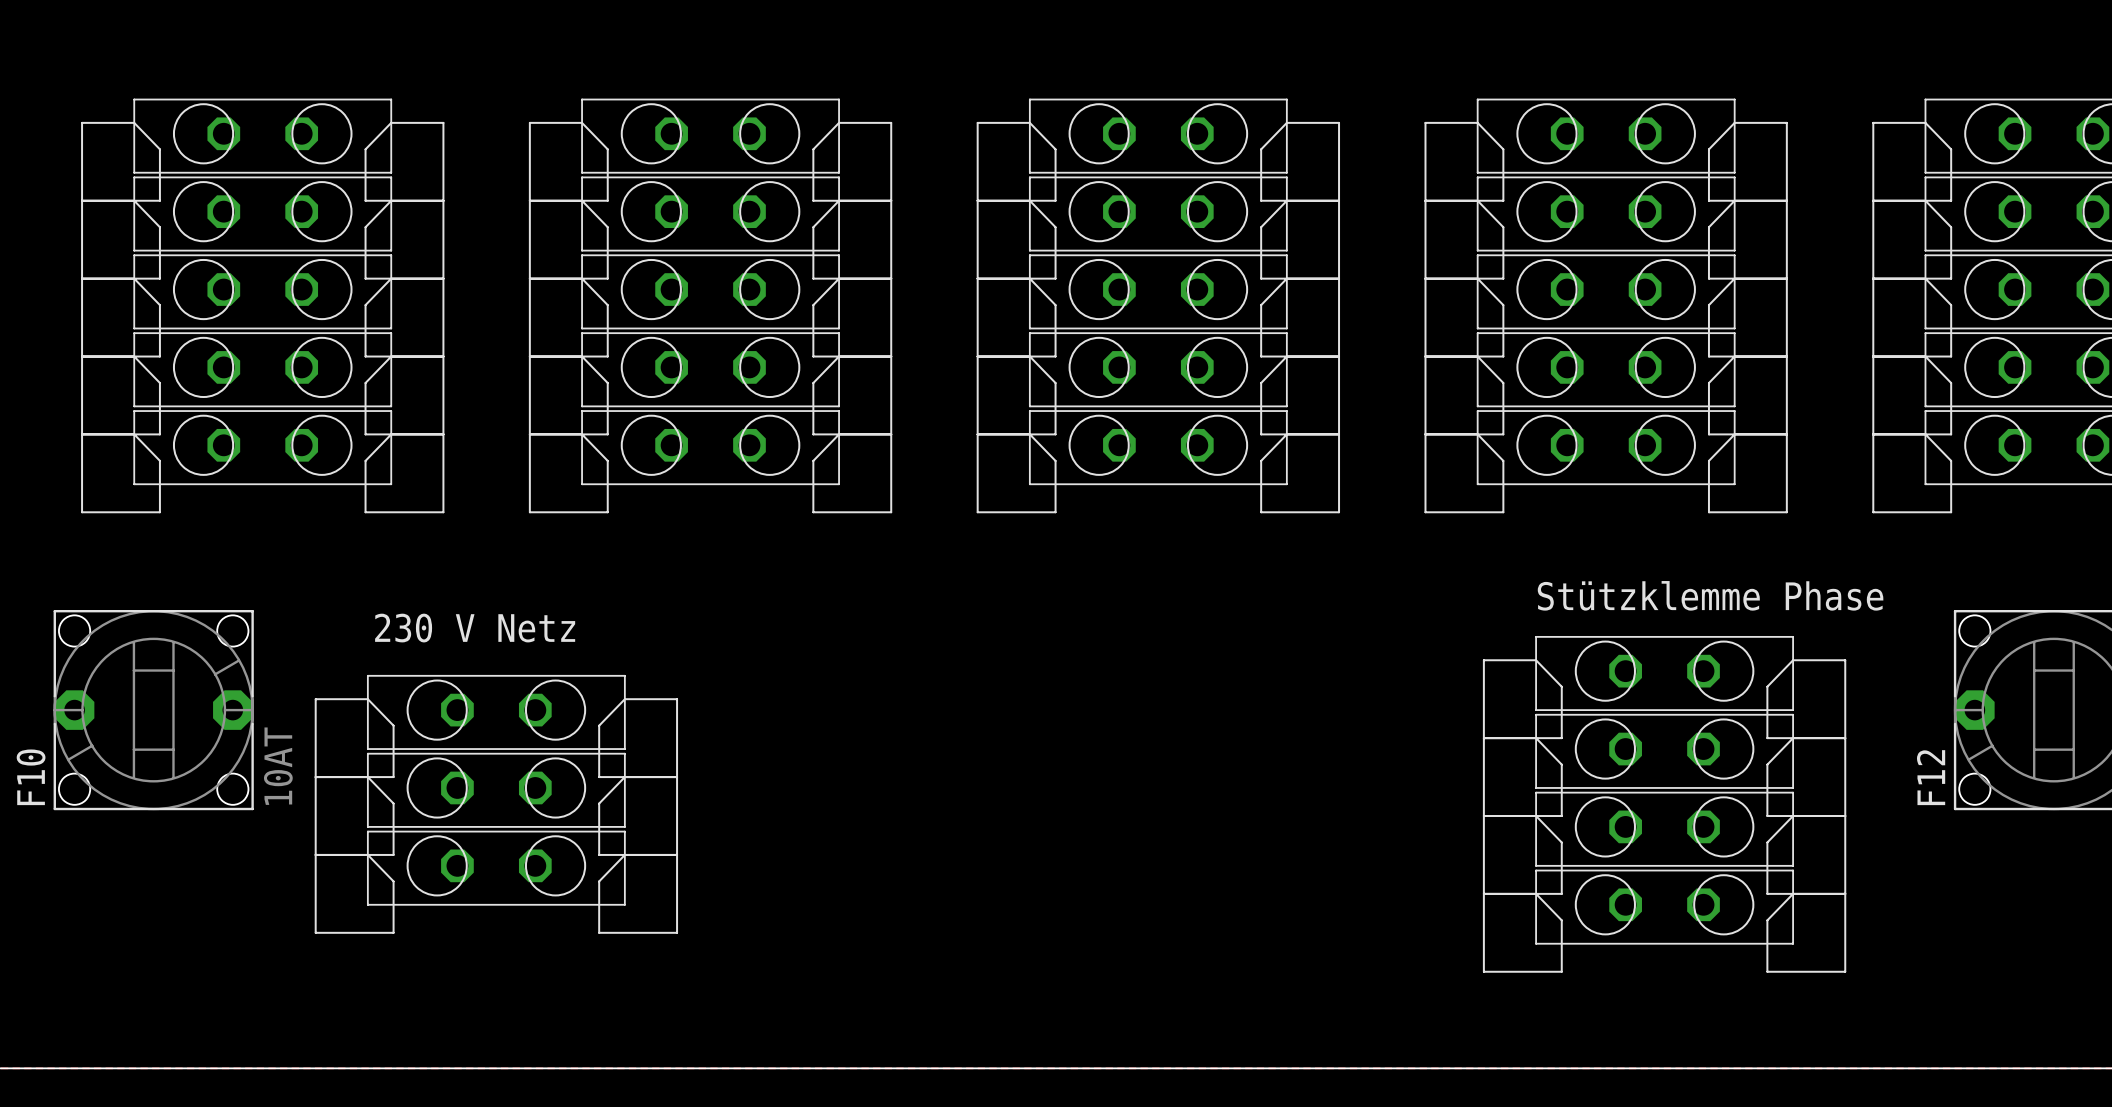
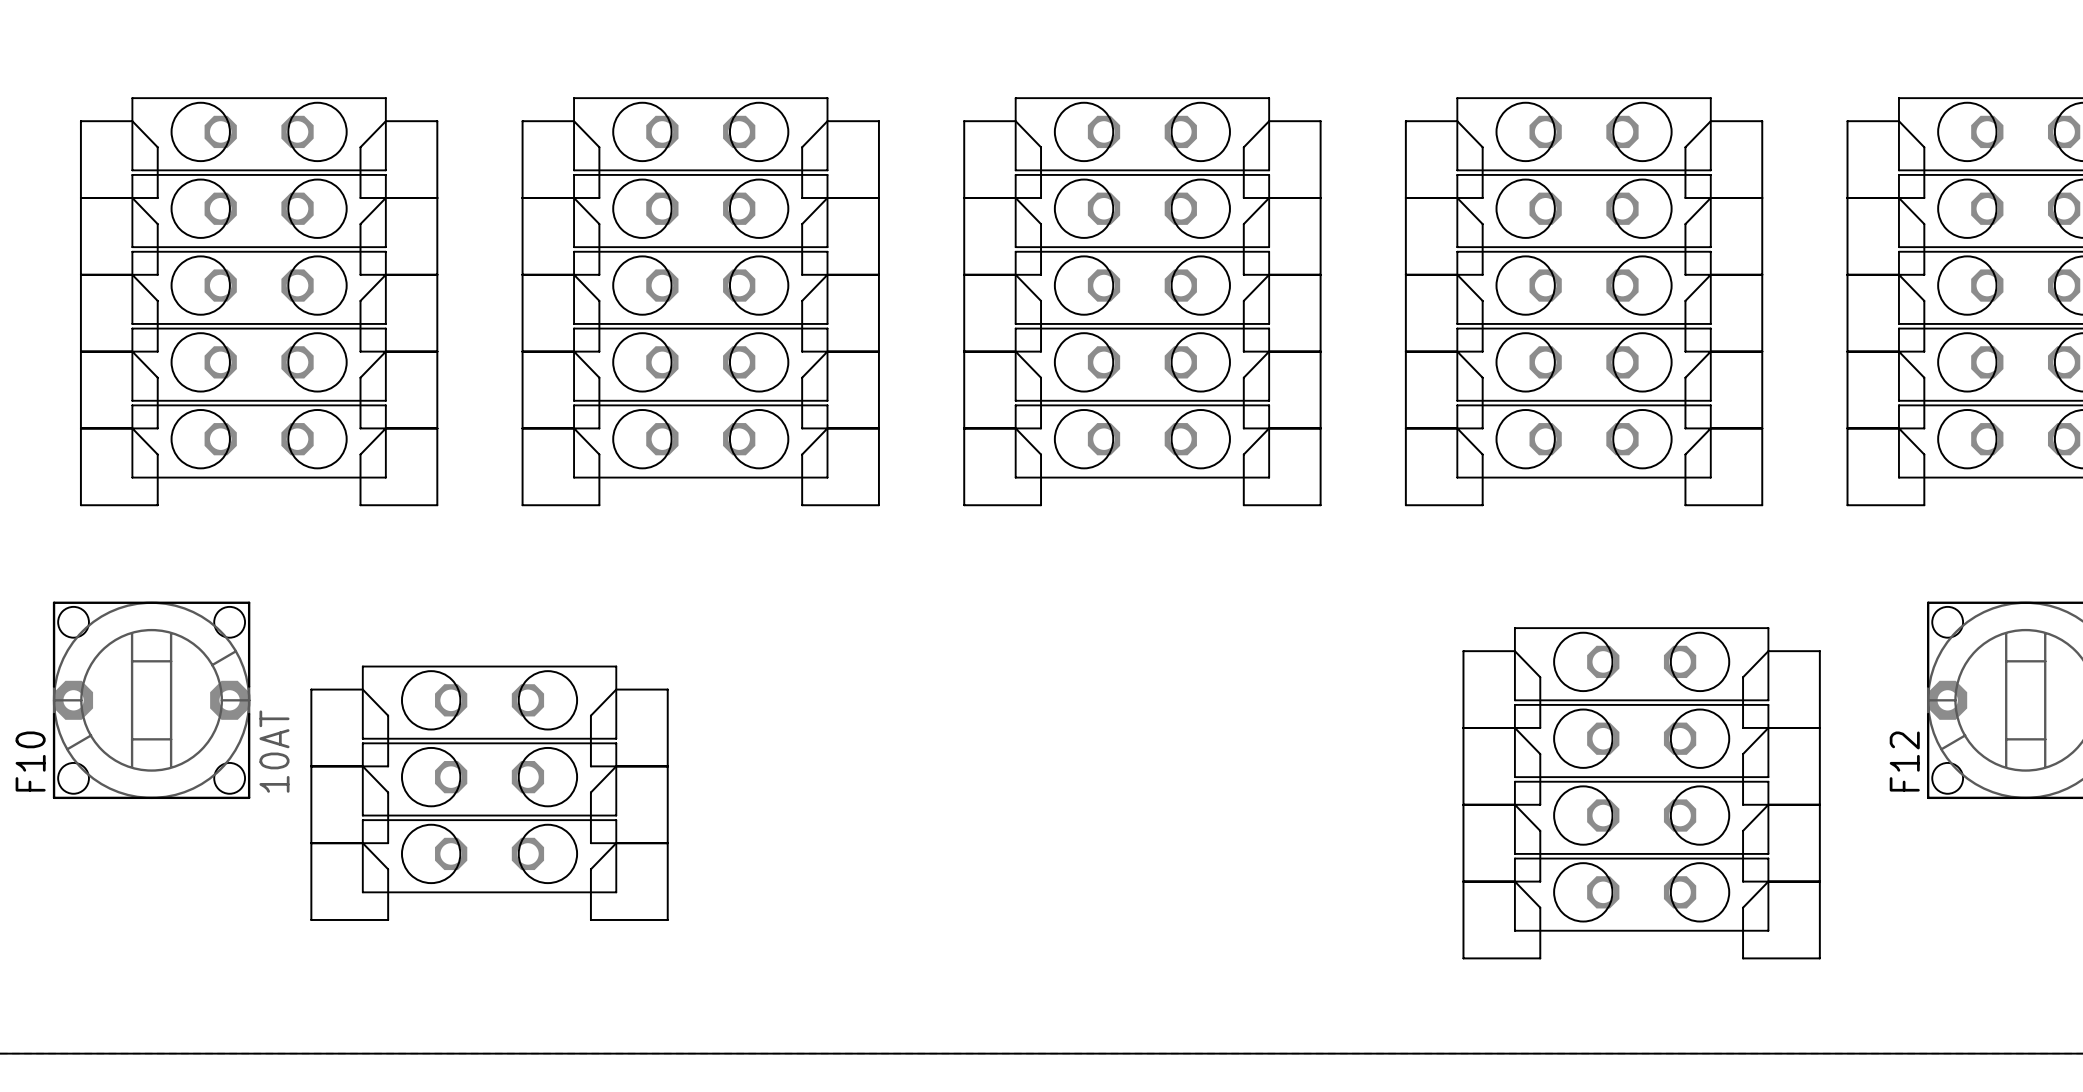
text: Stützklemme Phase (1710, 595) -> none
text: 230 V Netz (475, 628) -> none

